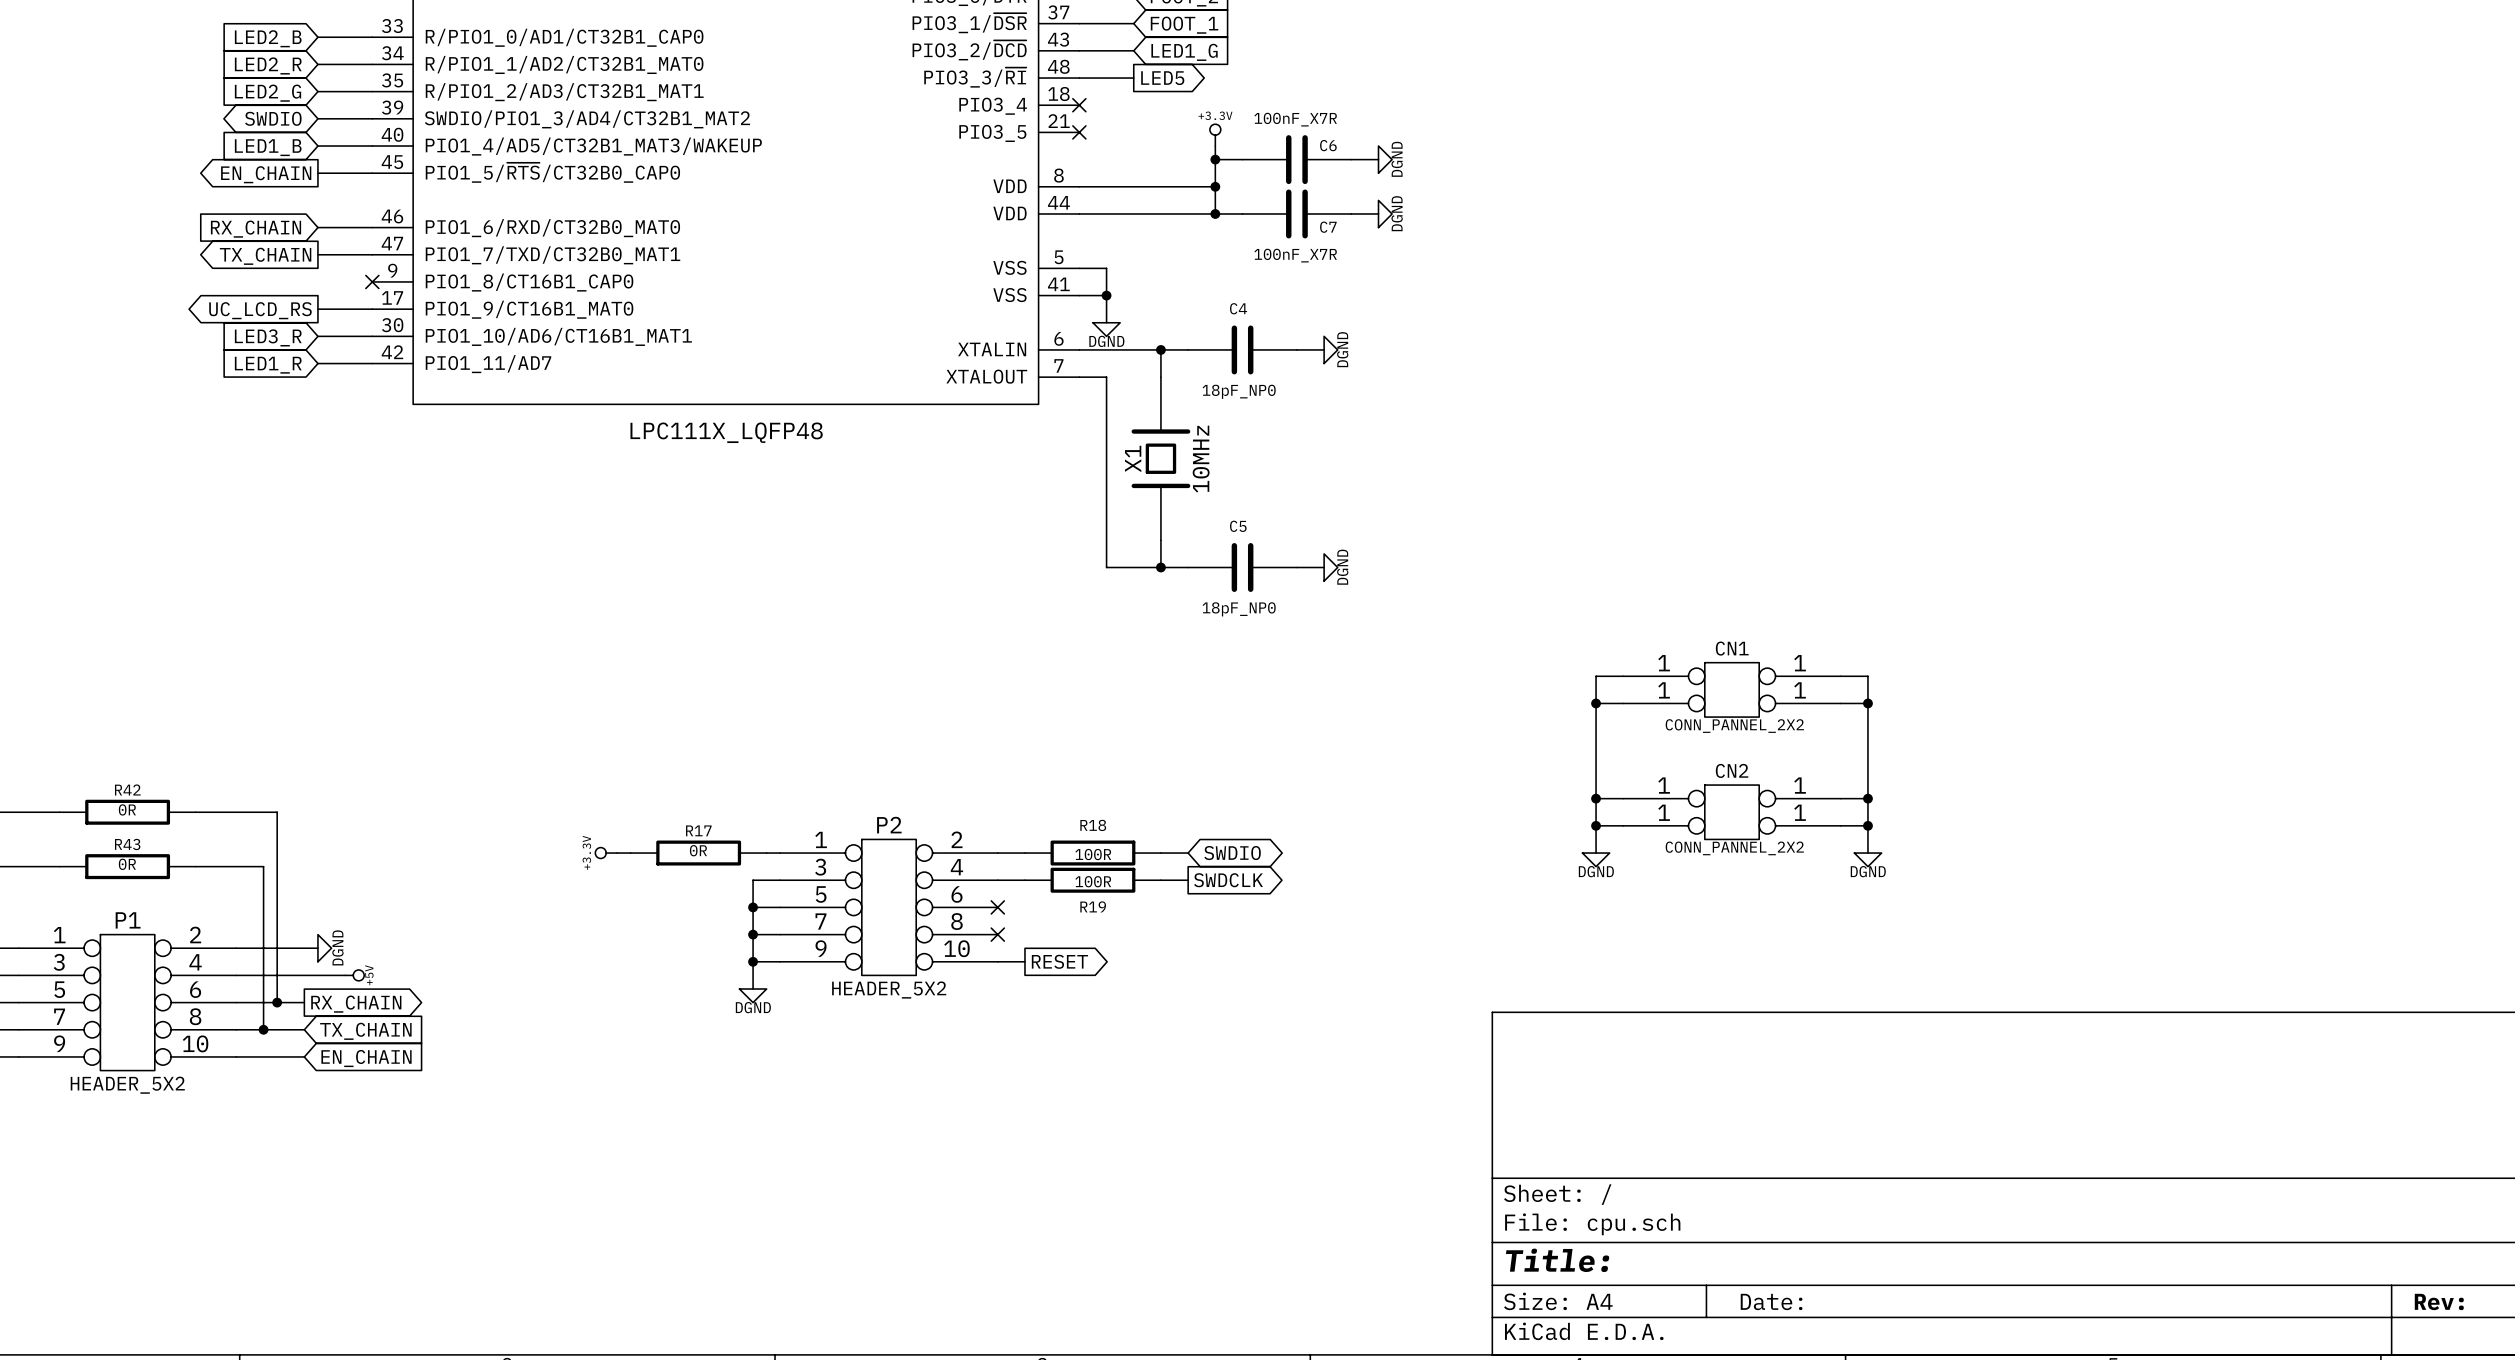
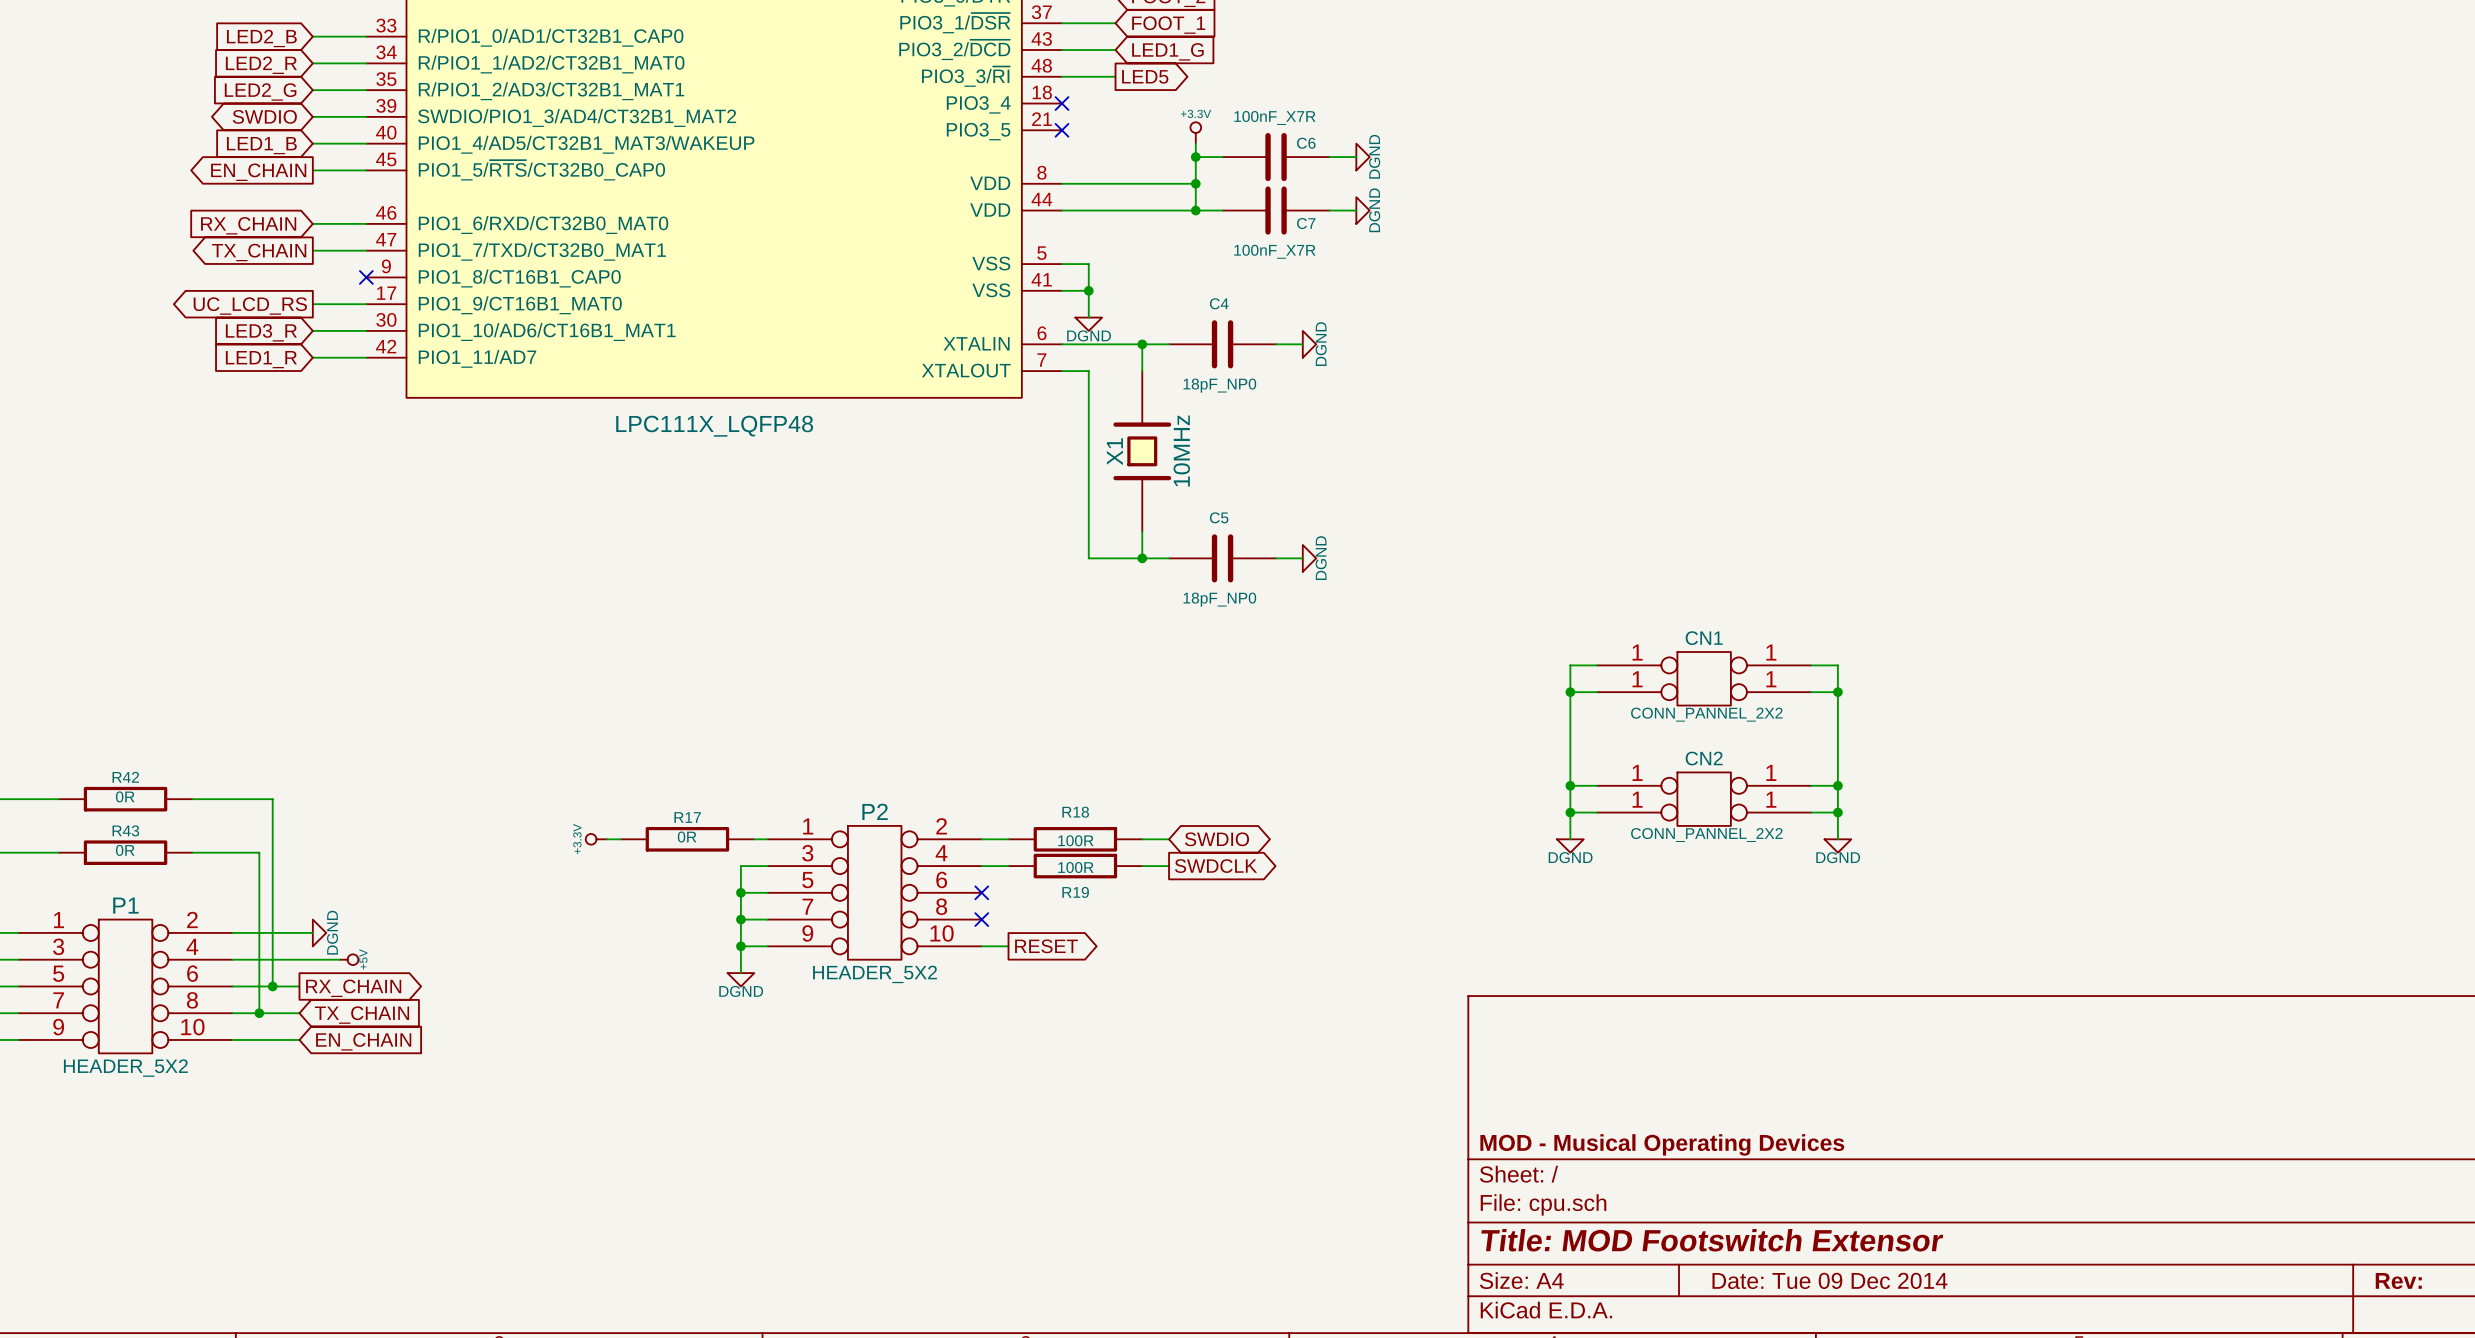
title block: none -> MOD - Musical Operating Devices (1662, 1144)
title block: Title: (1557, 1260) -> Title: MOD Footswitch Extensor (1712, 1240)
title block: Date: (1771, 1301) -> Date: Tue 09 Dec 2014 (1829, 1280)

